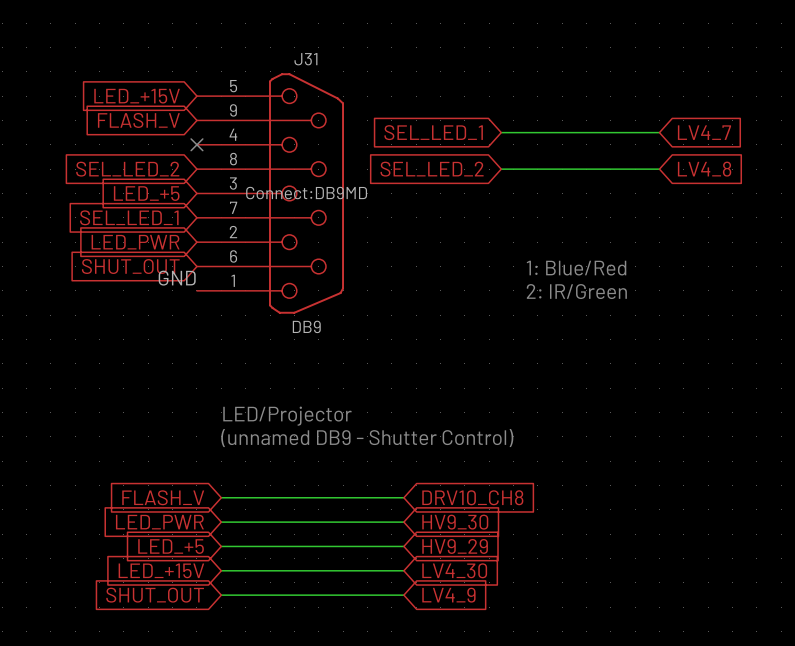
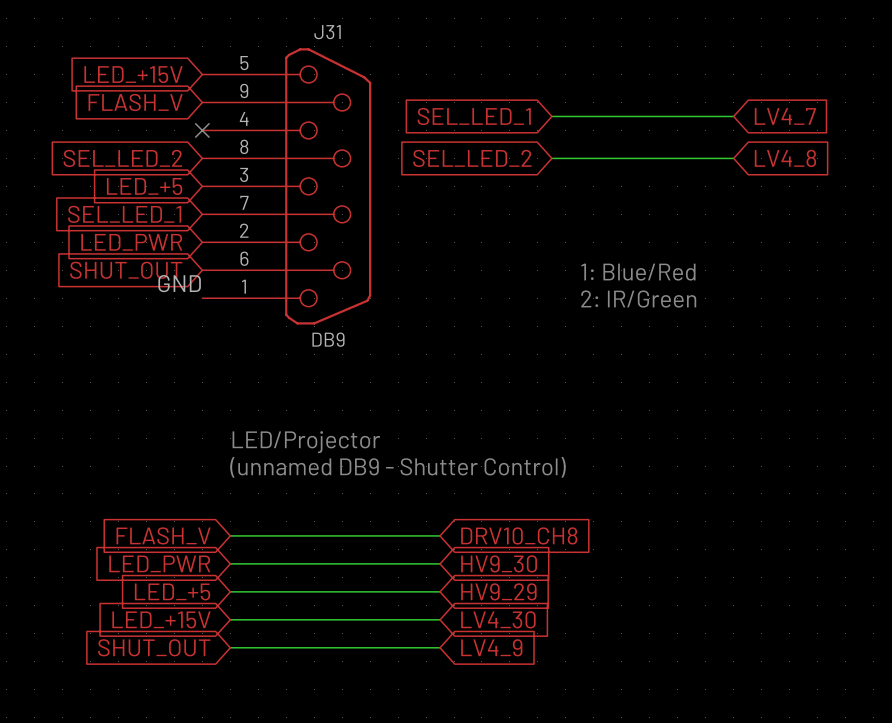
J31 text: Connect:DB9MD (306, 193) -> none

